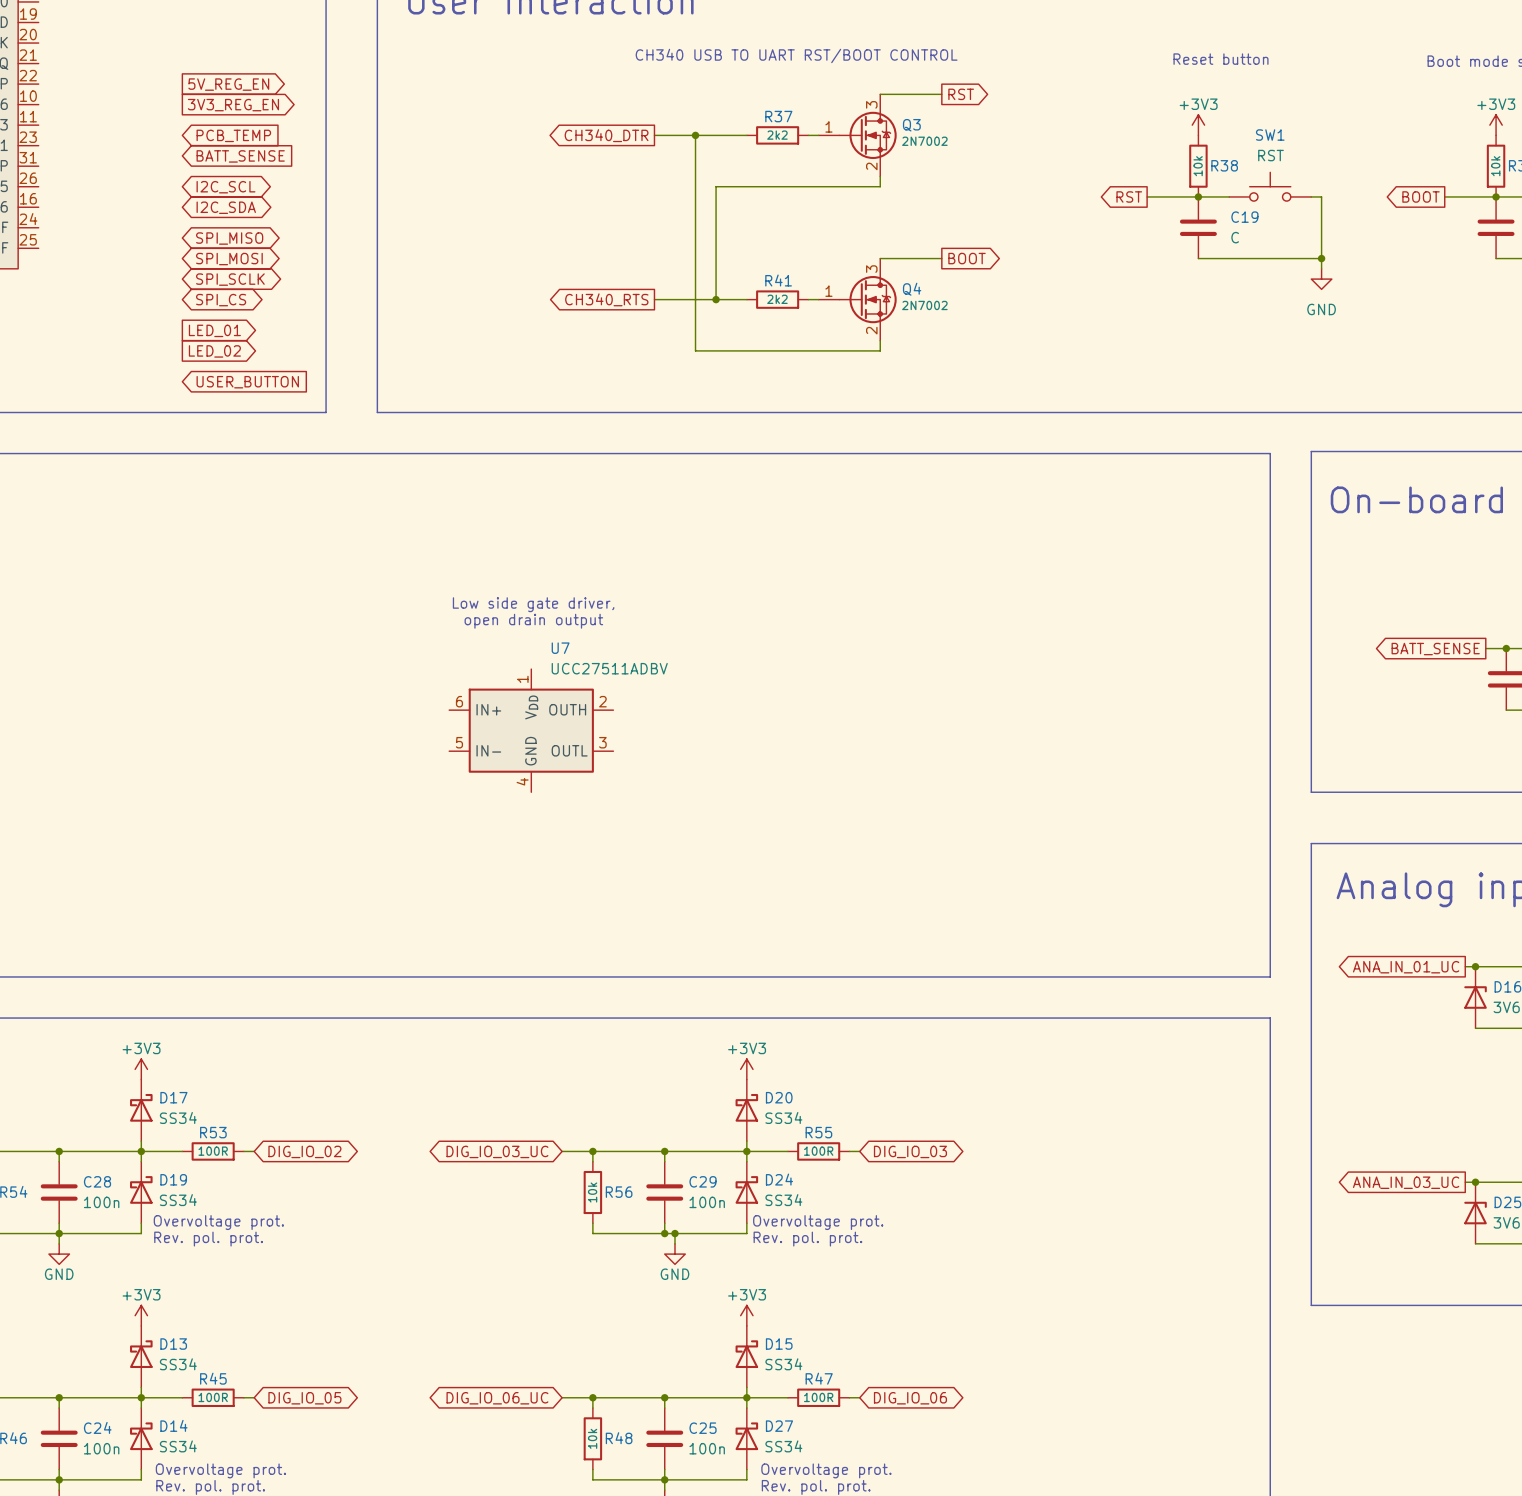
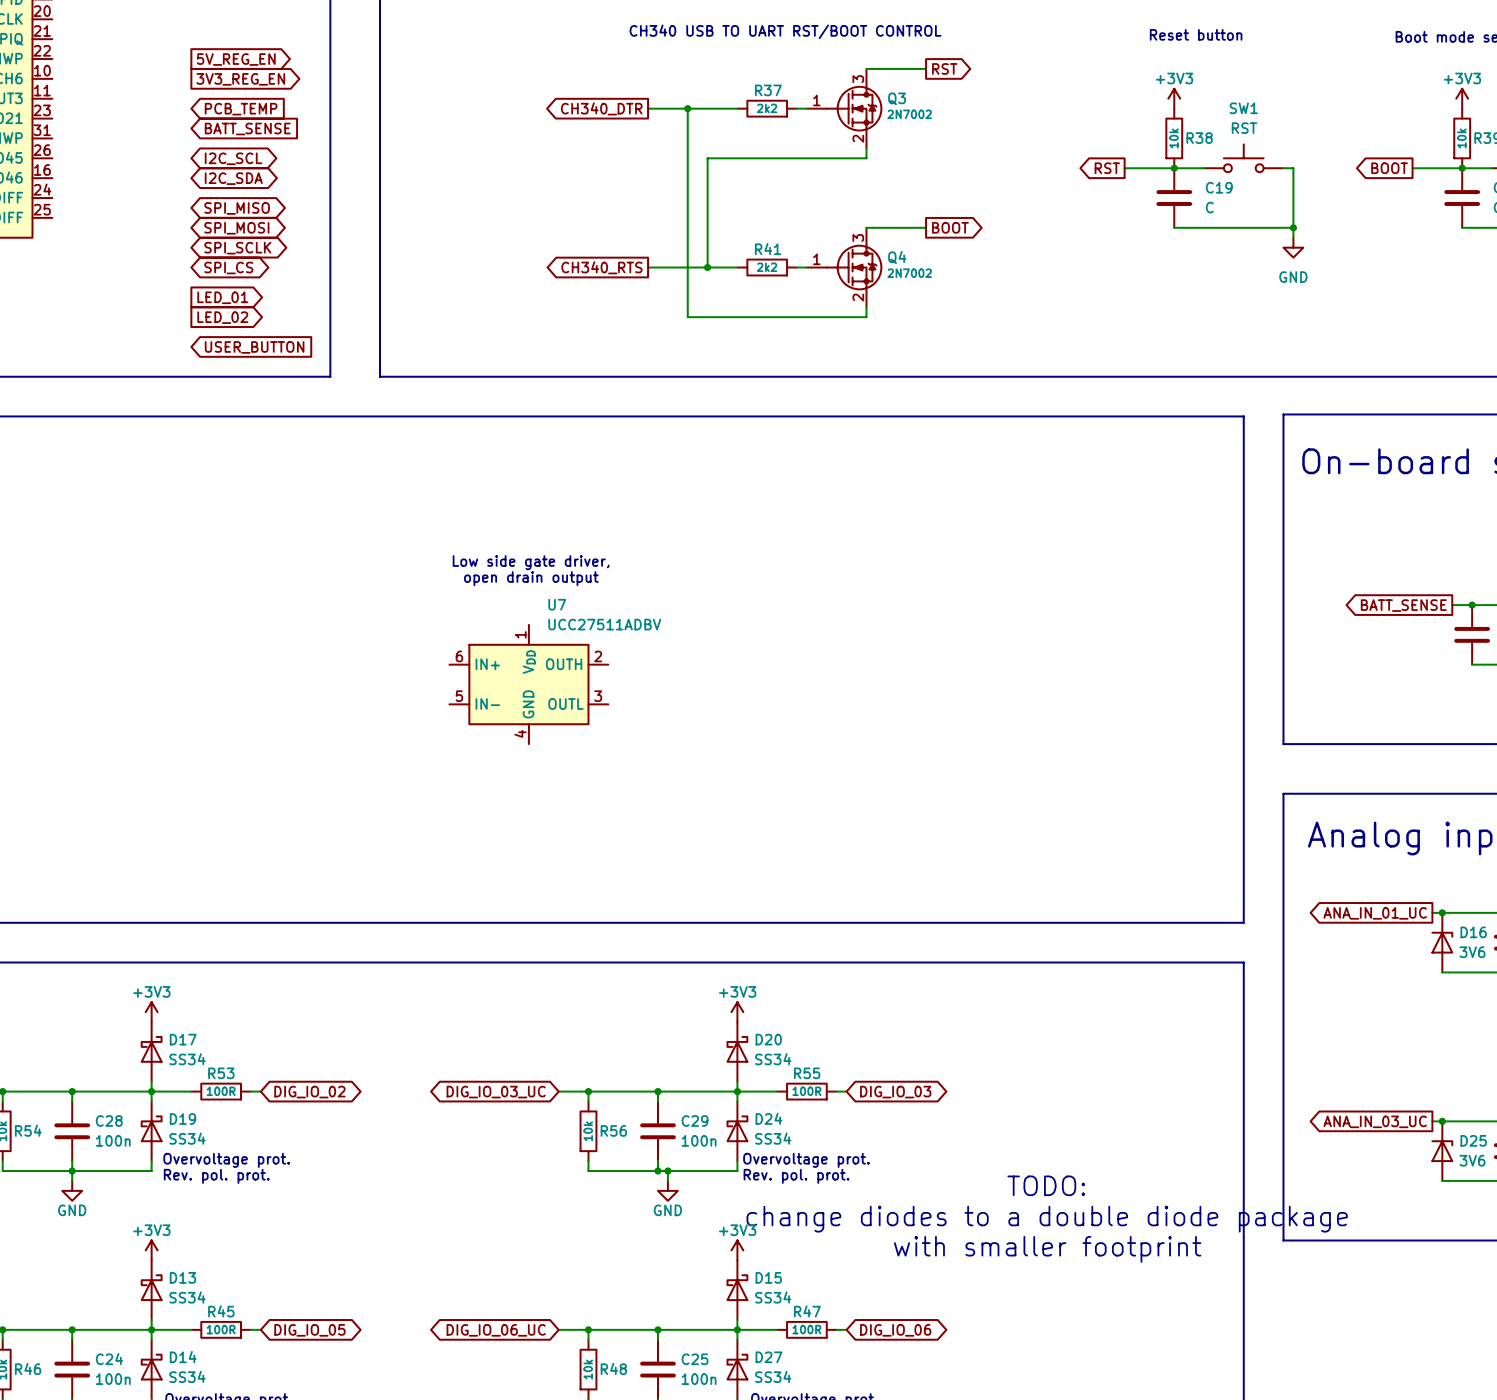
text: none -> TODO: (1046, 1185)
text: none -> change diodes to a double diode package (1047, 1219)
text: none -> with smaller footprint (1047, 1249)

